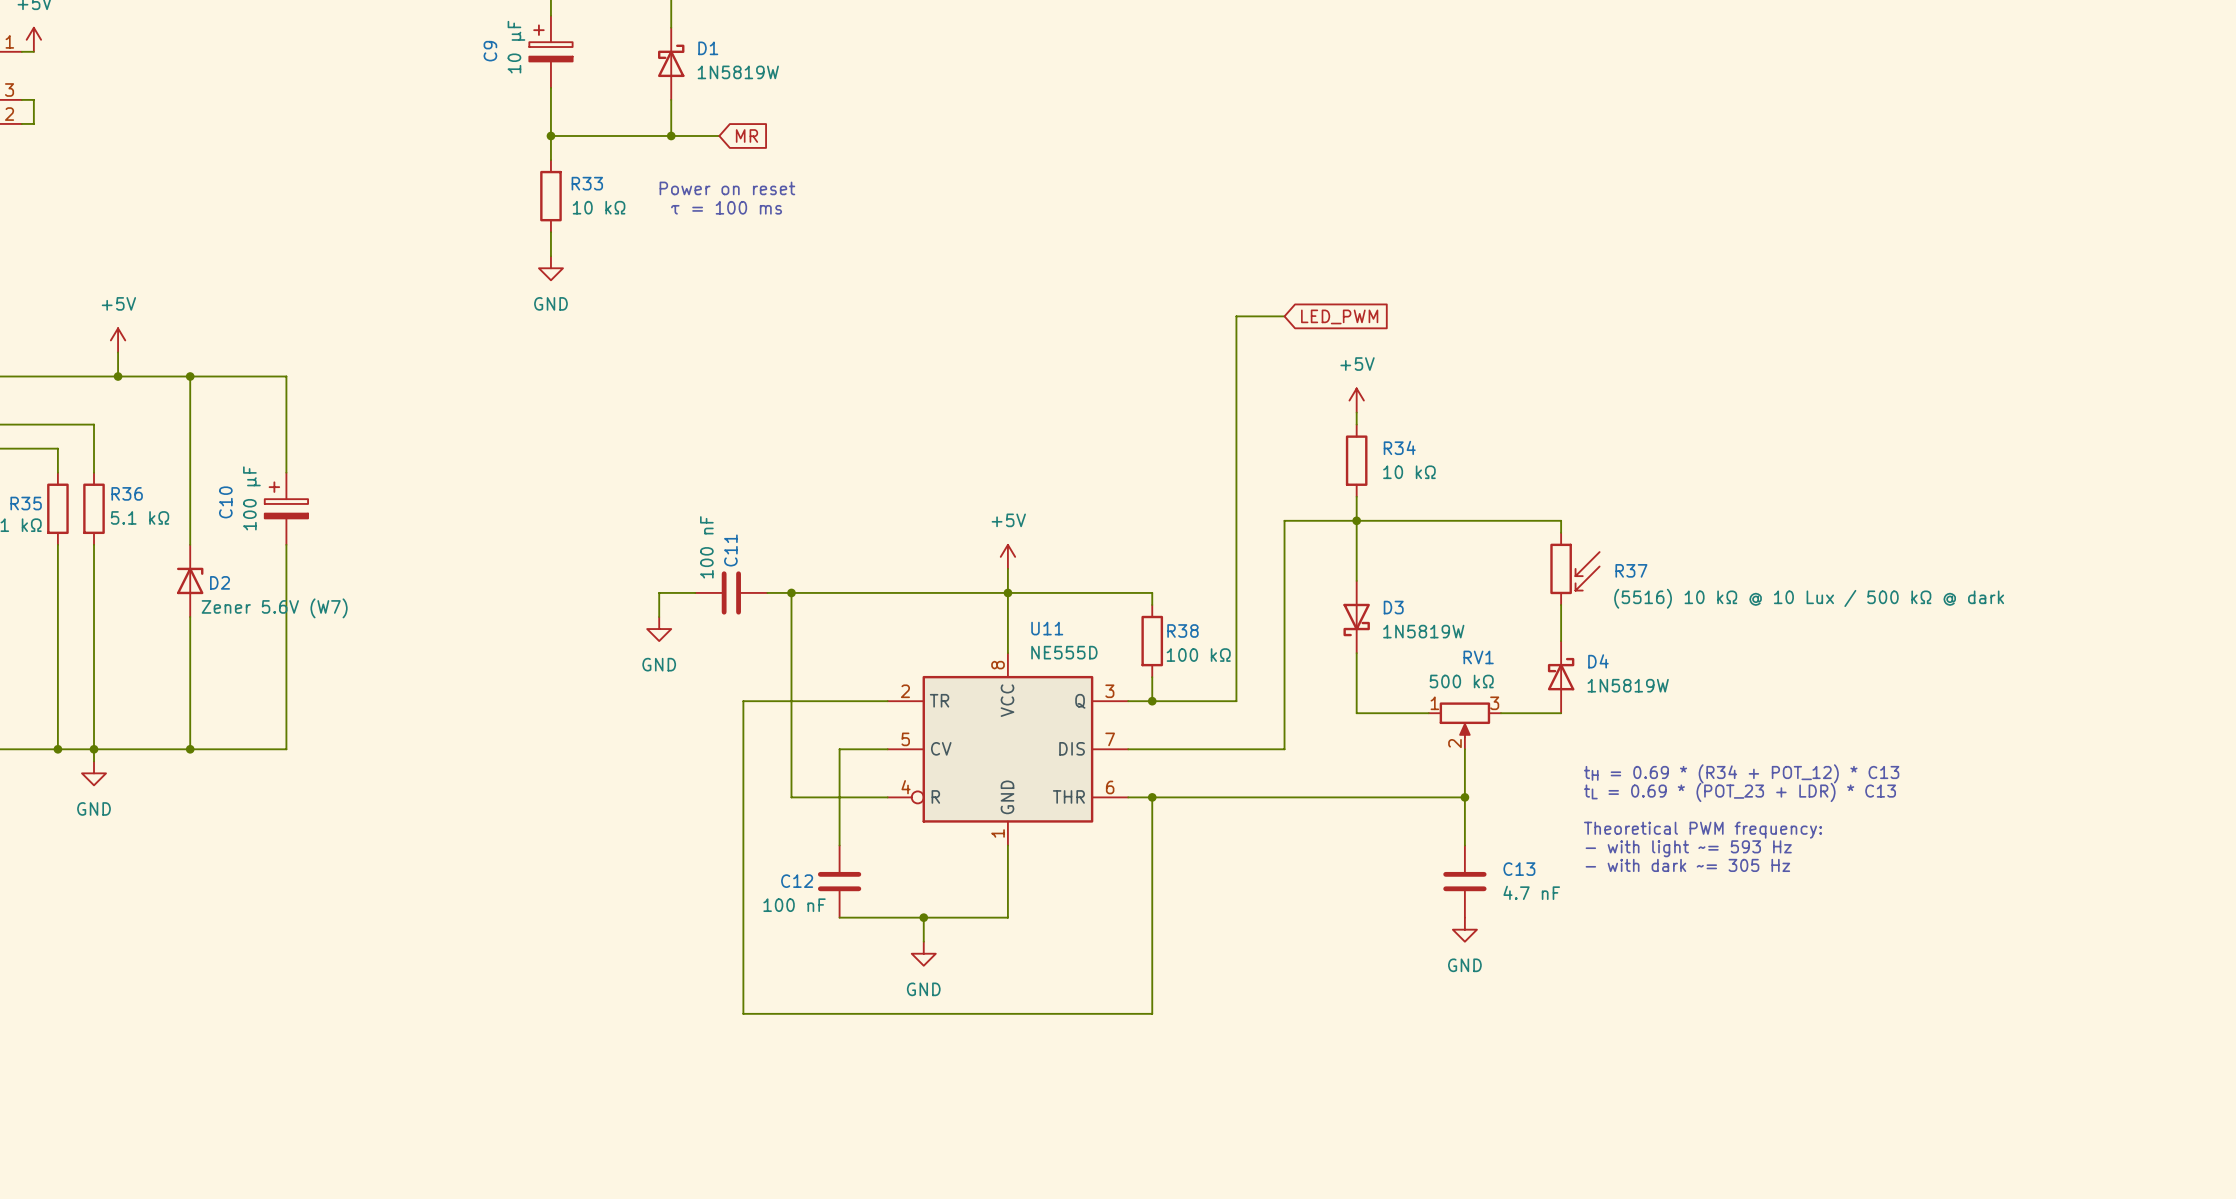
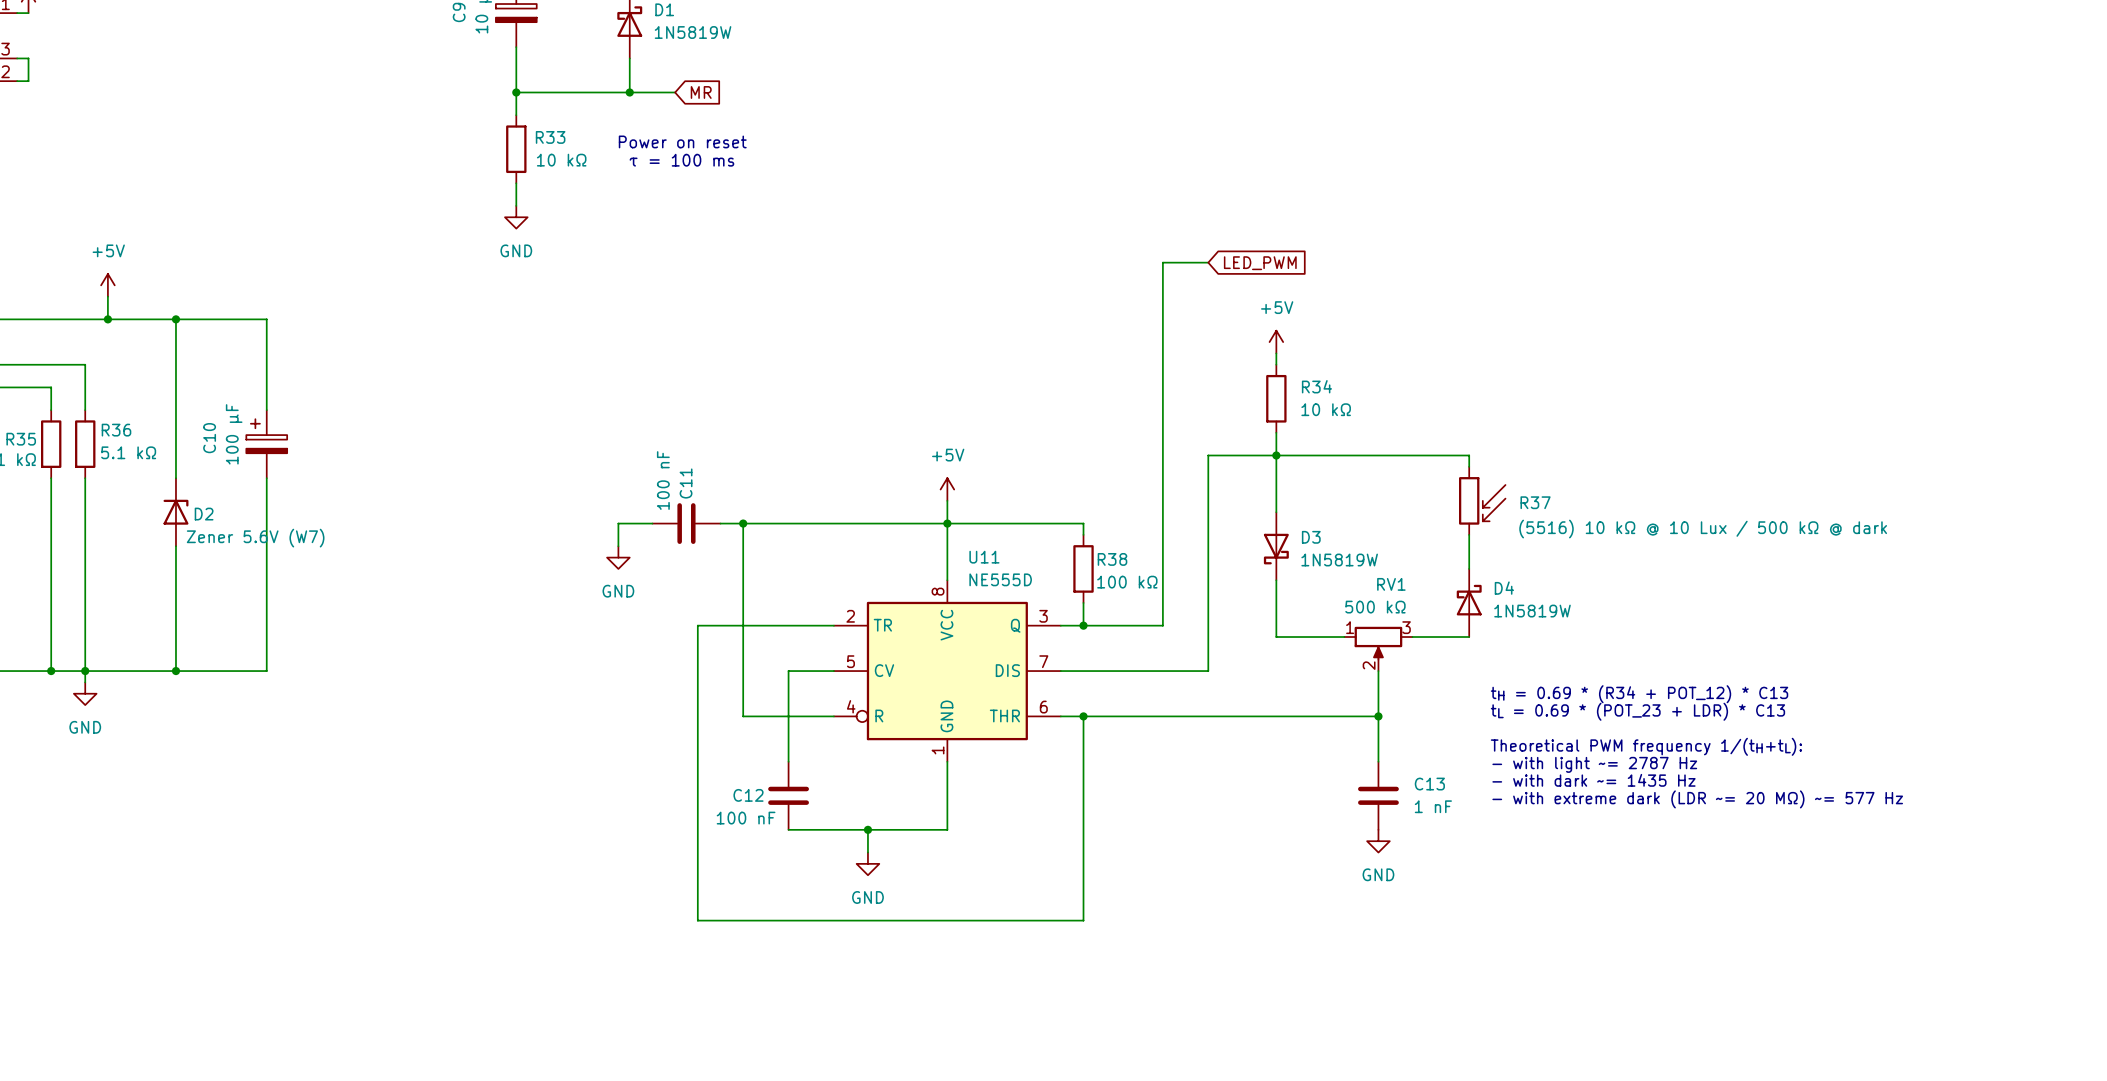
text: Theoretical PWM frequency: (1703, 830) -> Theoretical PWM frequency 1/(tH+tL): (1646, 746)
text: - with light ~= 593 Hz (1688, 848) -> - with light ~= 2787 Hz (1594, 764)
text: - with dark ~= 305 Hz (1687, 865) -> - with dark ~= 1435 Hz (1593, 780)
text: none -> - with extreme dark (LDR ~= 20 MΩ) ~= 577 Hz (1697, 799)
C13 value: 4.7 nF (1531, 892) -> 1 nF (1433, 806)

